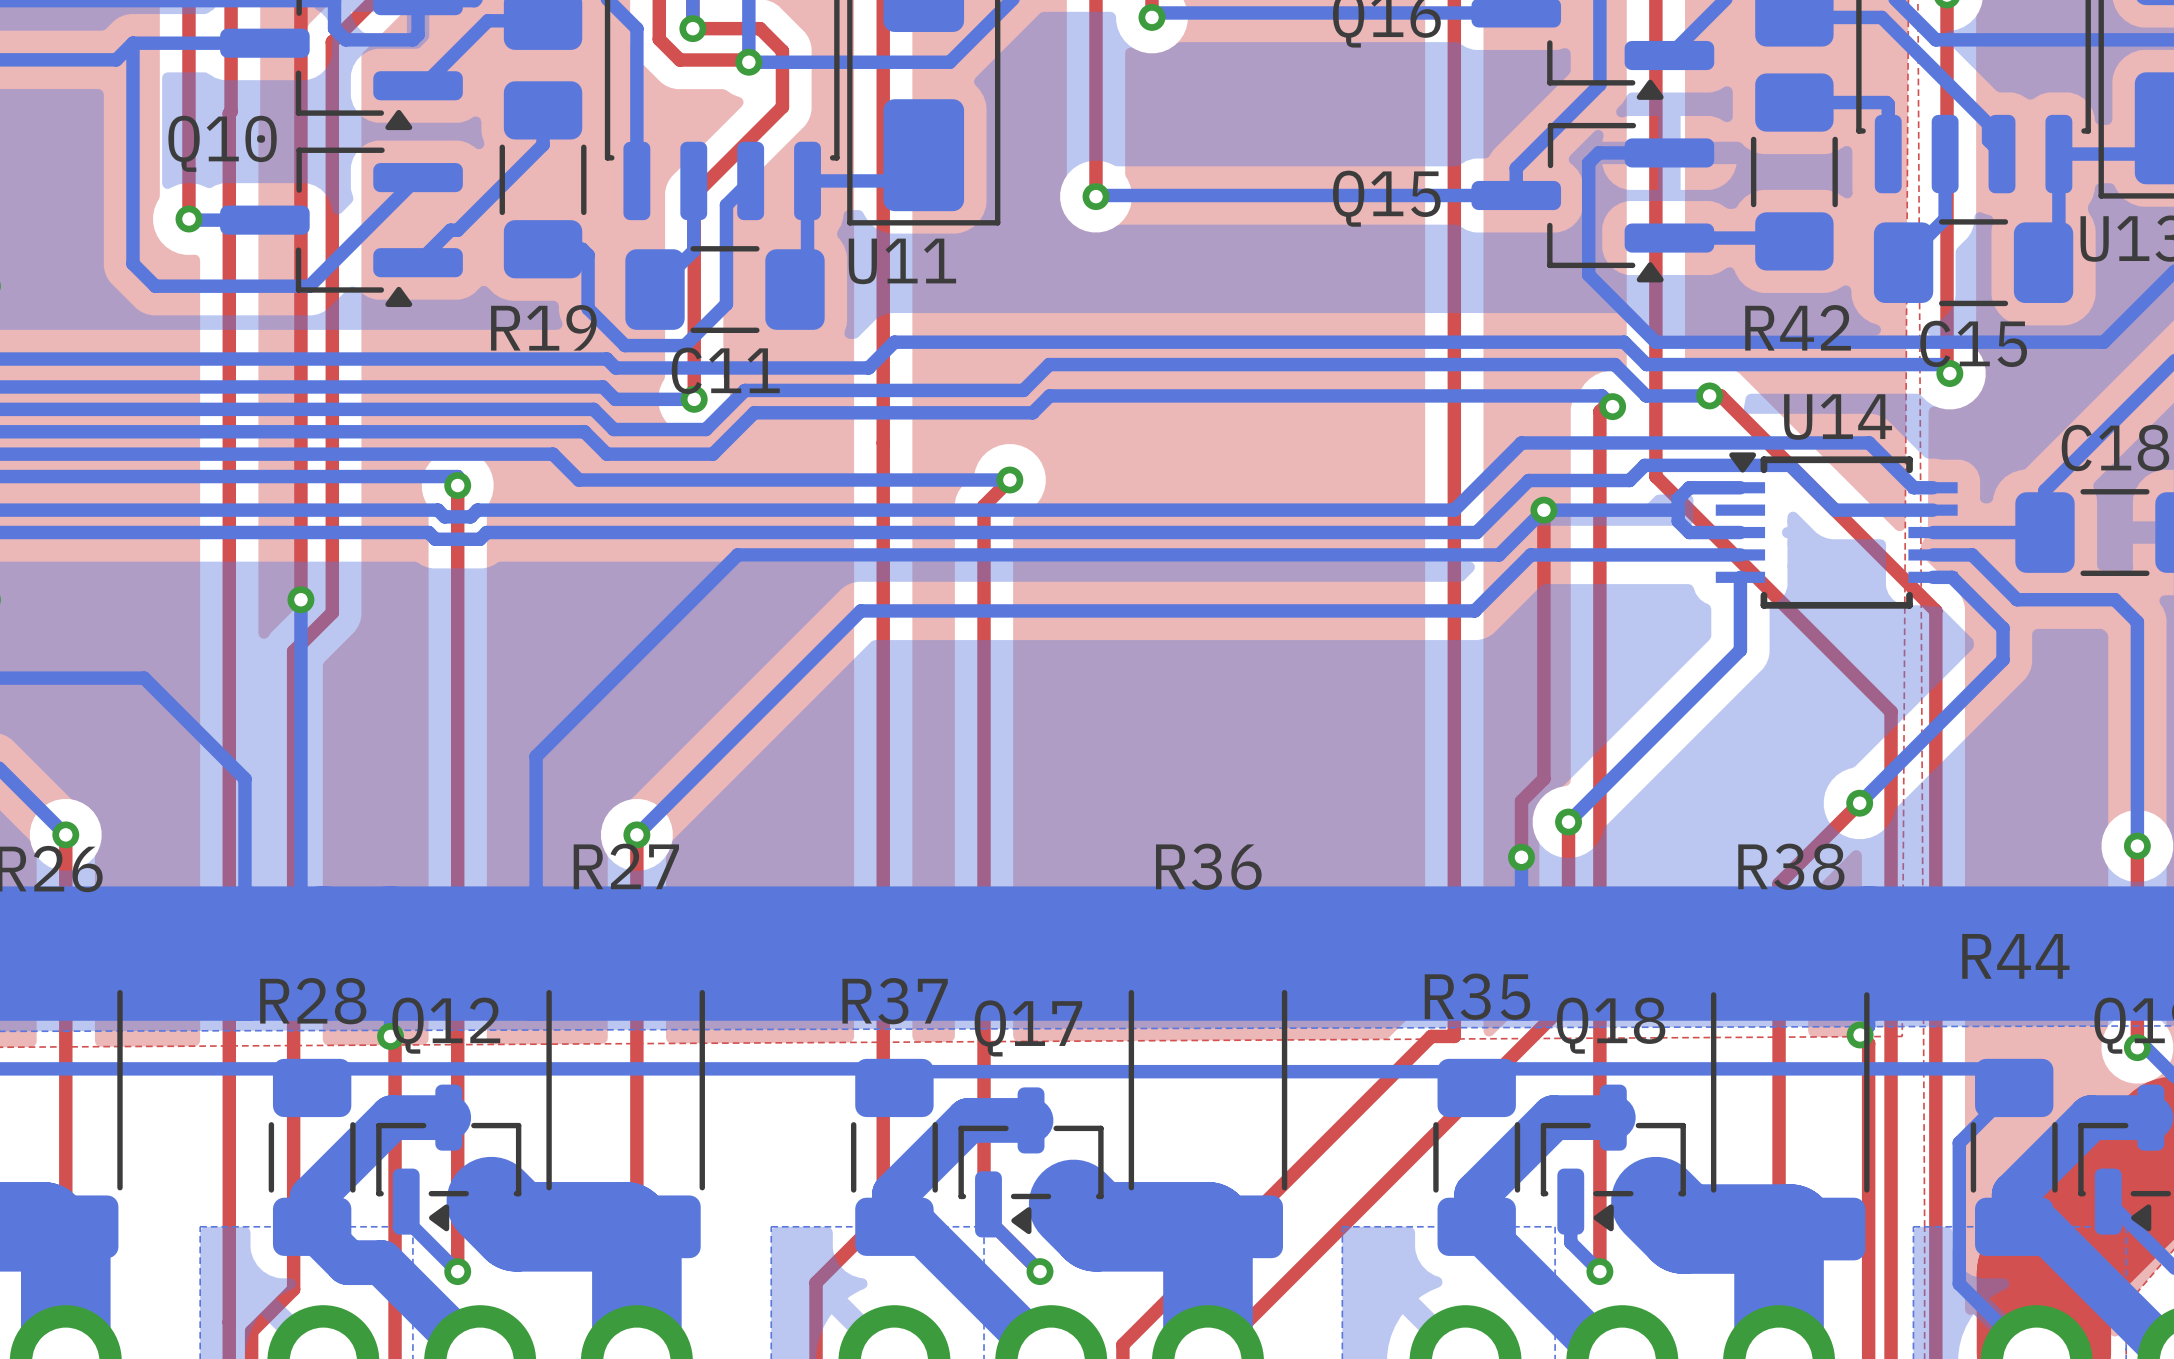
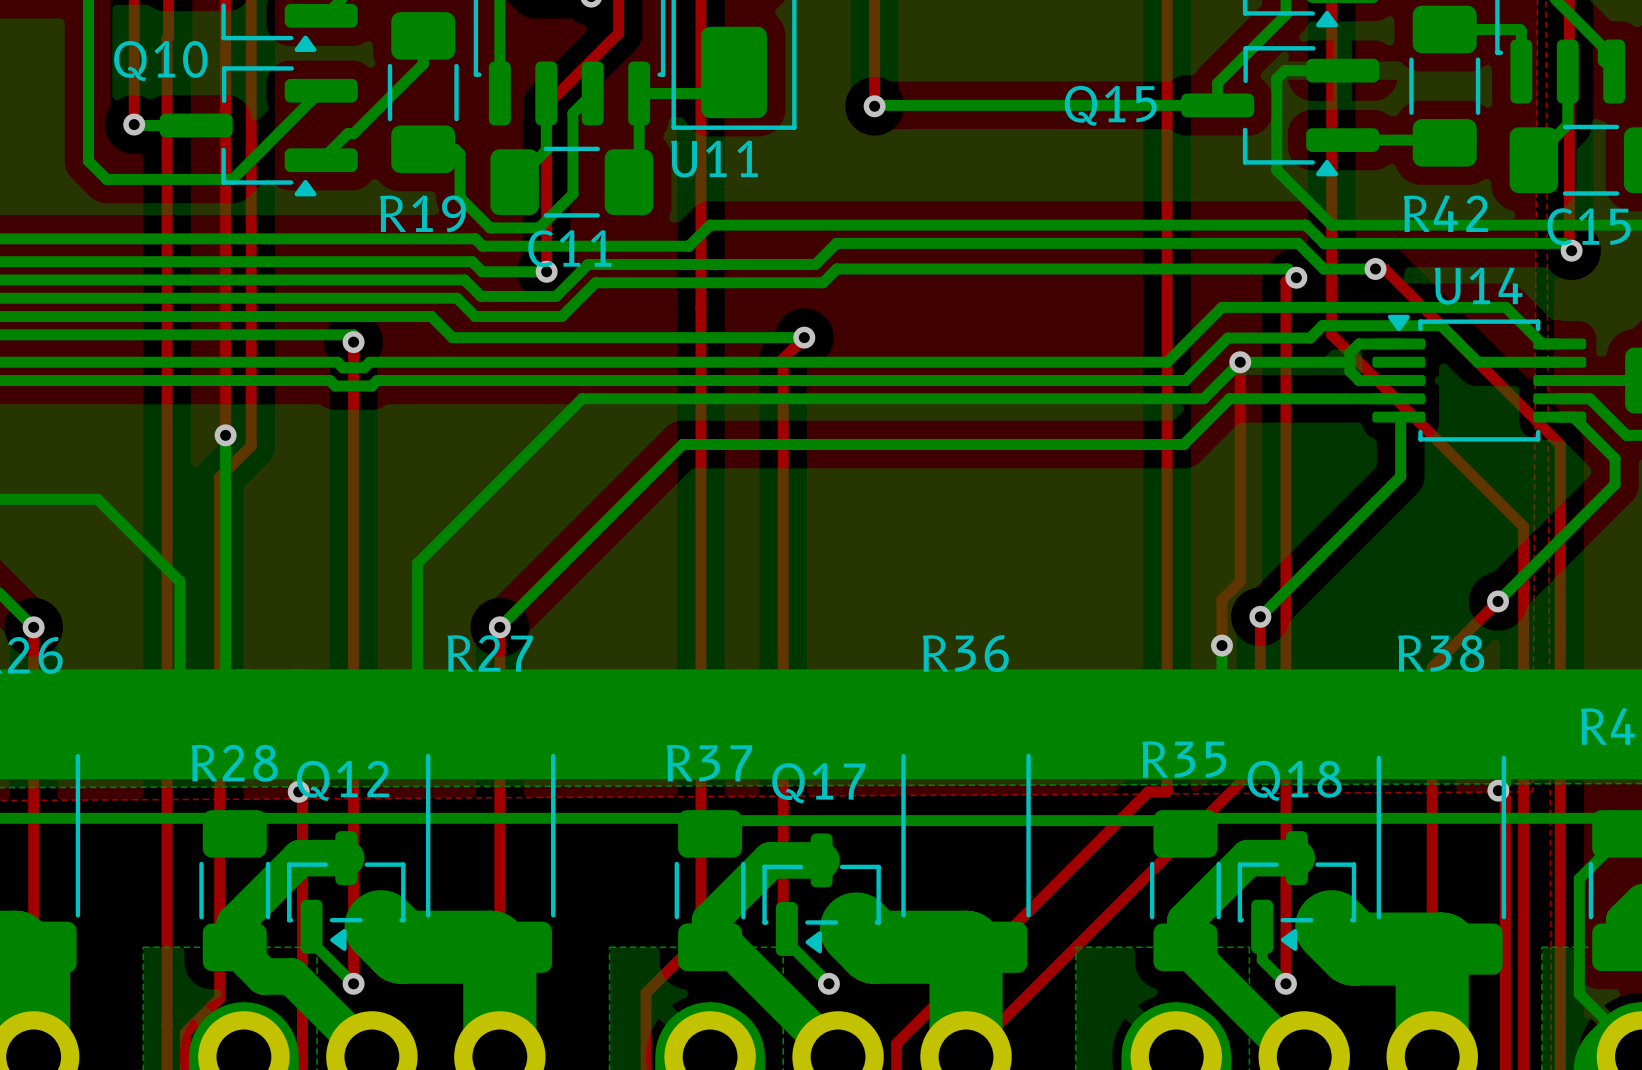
U14 footprint: [1715, 452, 1958, 609] -> [1372, 314, 1587, 442]

